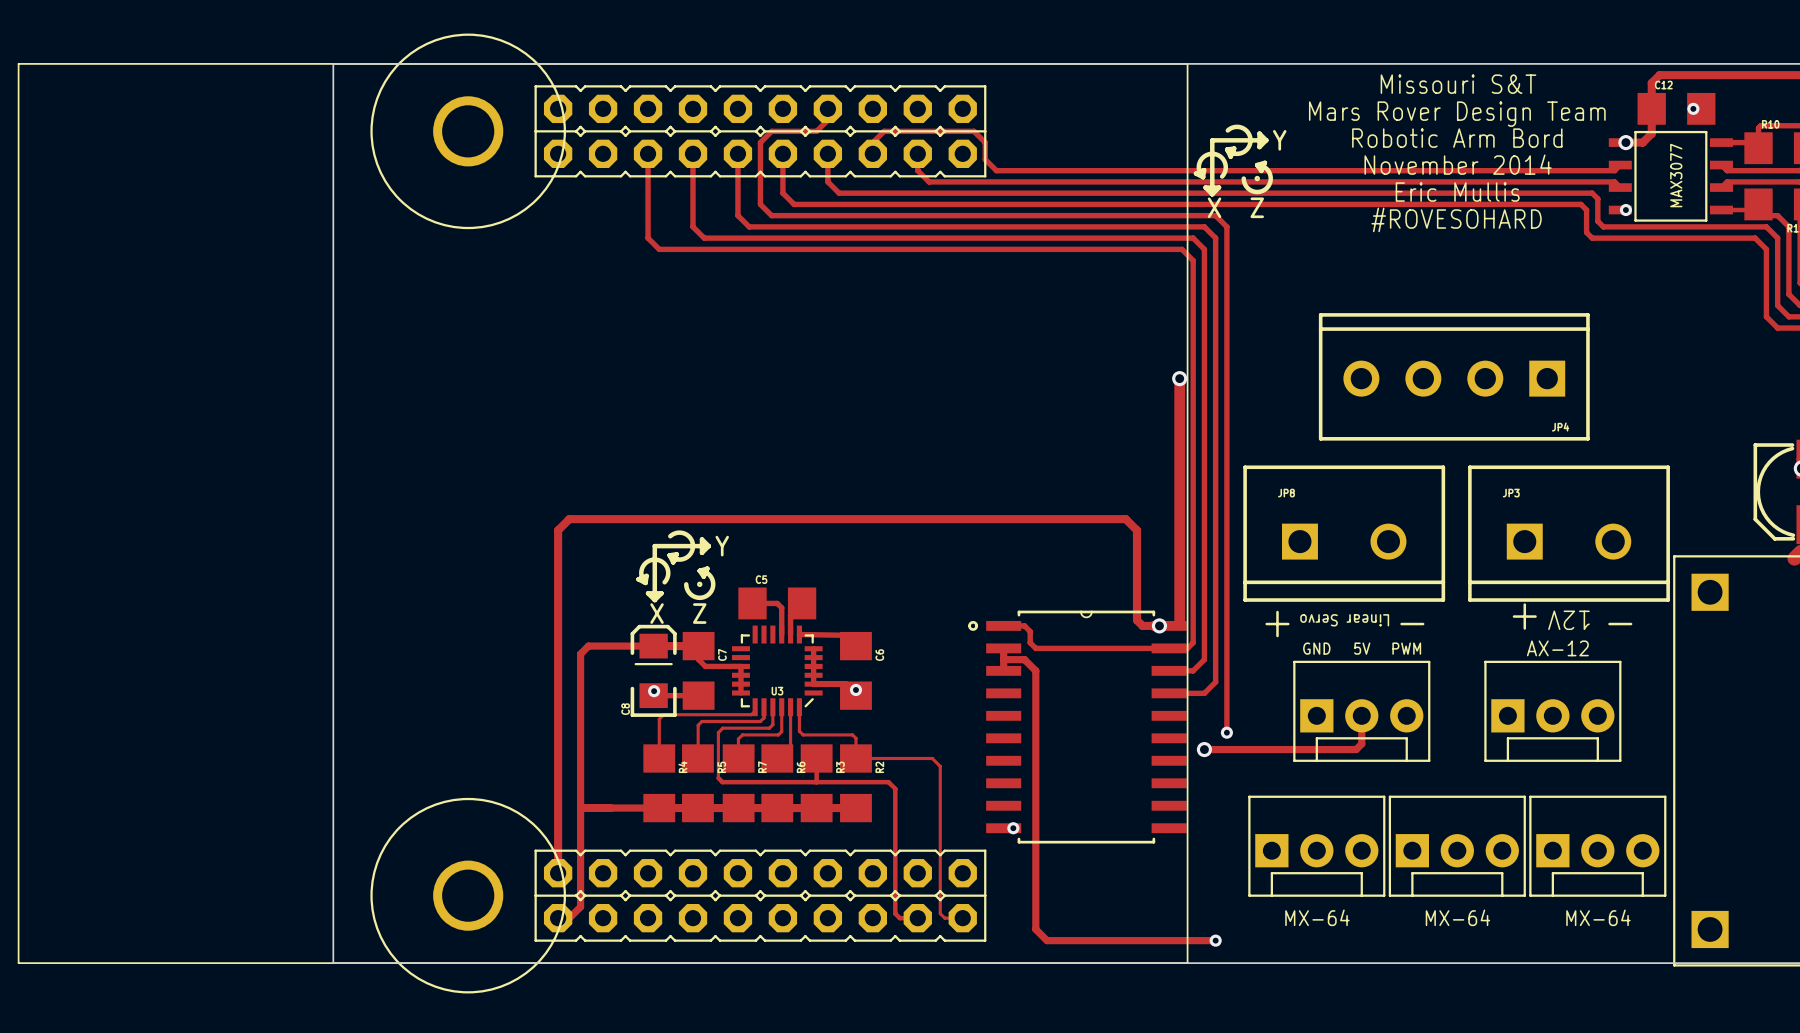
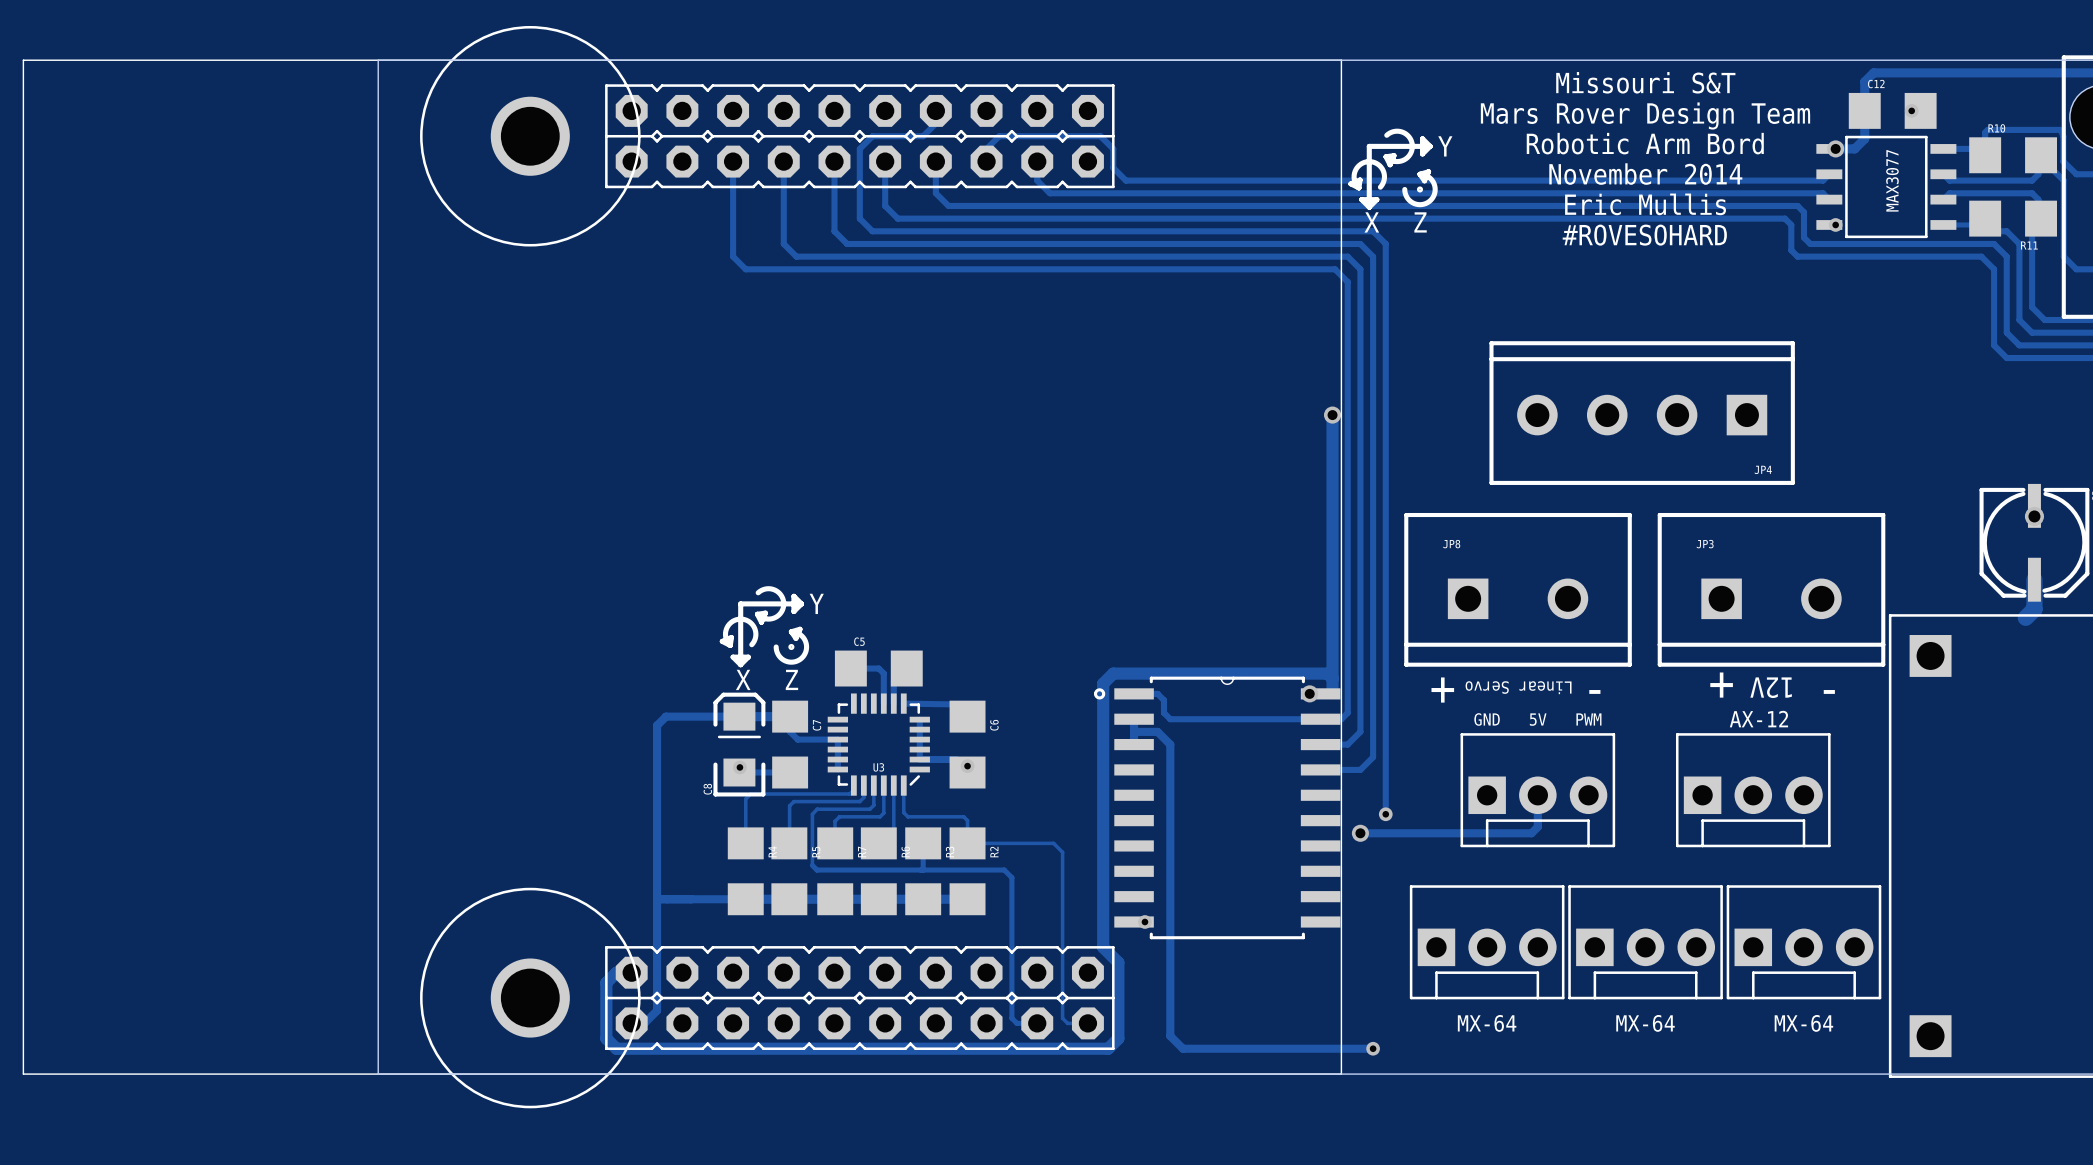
track: (1159, 625) (1142, 625) (1136, 620) (1136, 530) (1125, 519) (569, 519) (558, 530) (558, 873) -> (1332, 678) (1327, 673) (1113, 673) (1103, 683) (1103, 947) (1118, 962) (1118, 1038) (1108, 1048) (616, 1048) (606, 1038) (606, 982) (616, 972) (631, 972)

